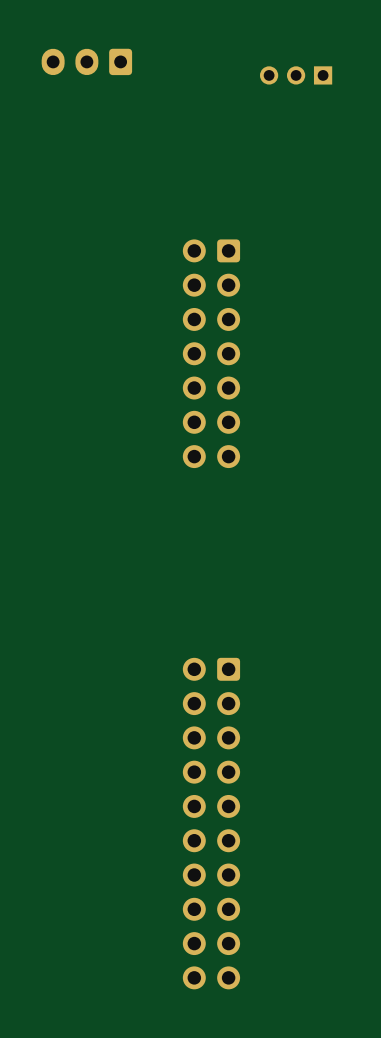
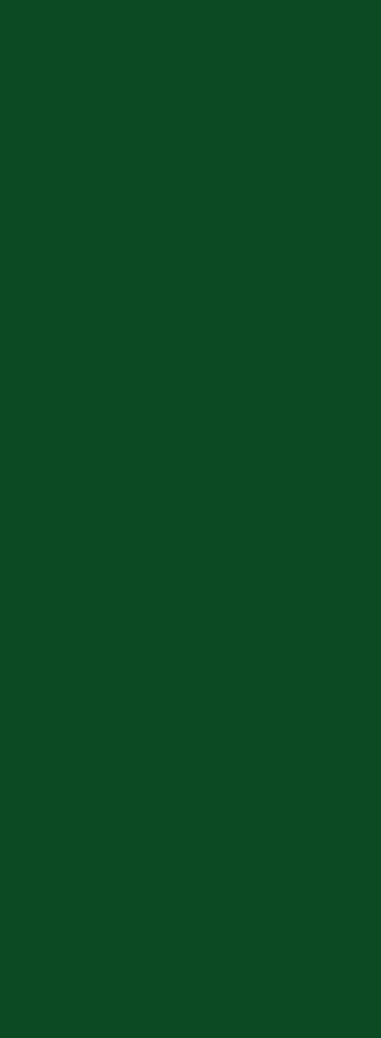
part: (86, 61) -> none
part: (296, 75) -> none
part: (211, 353) -> none
part: (211, 823) -> none

